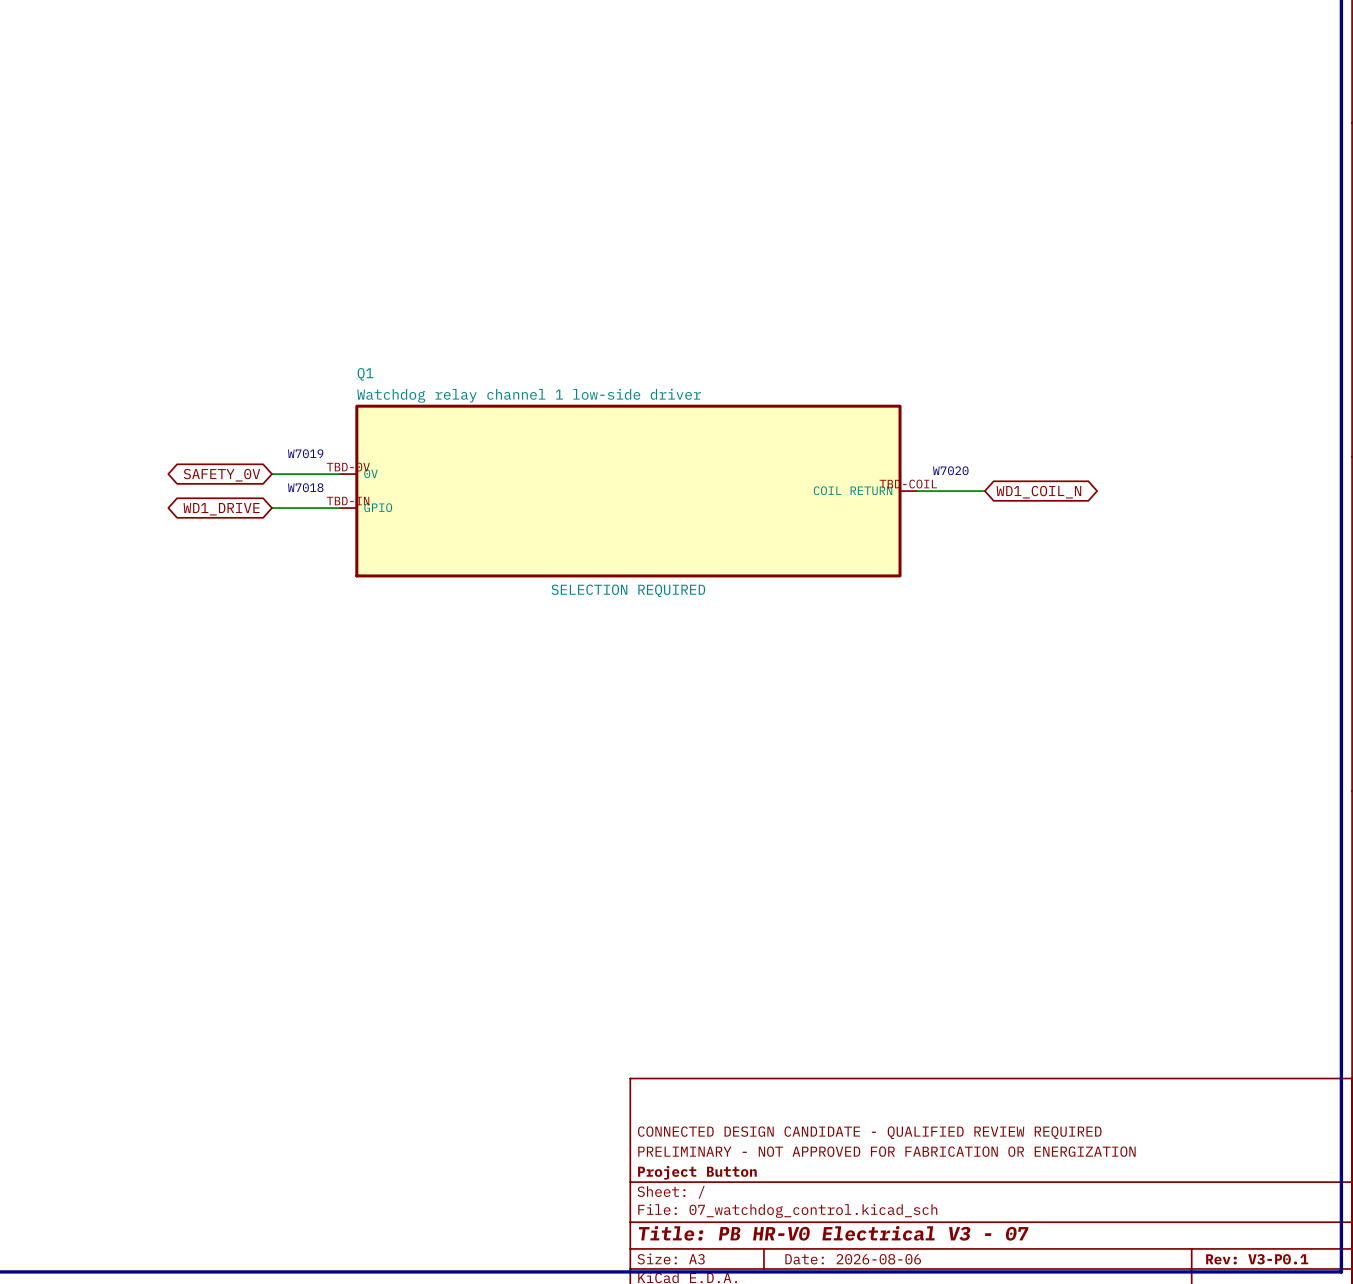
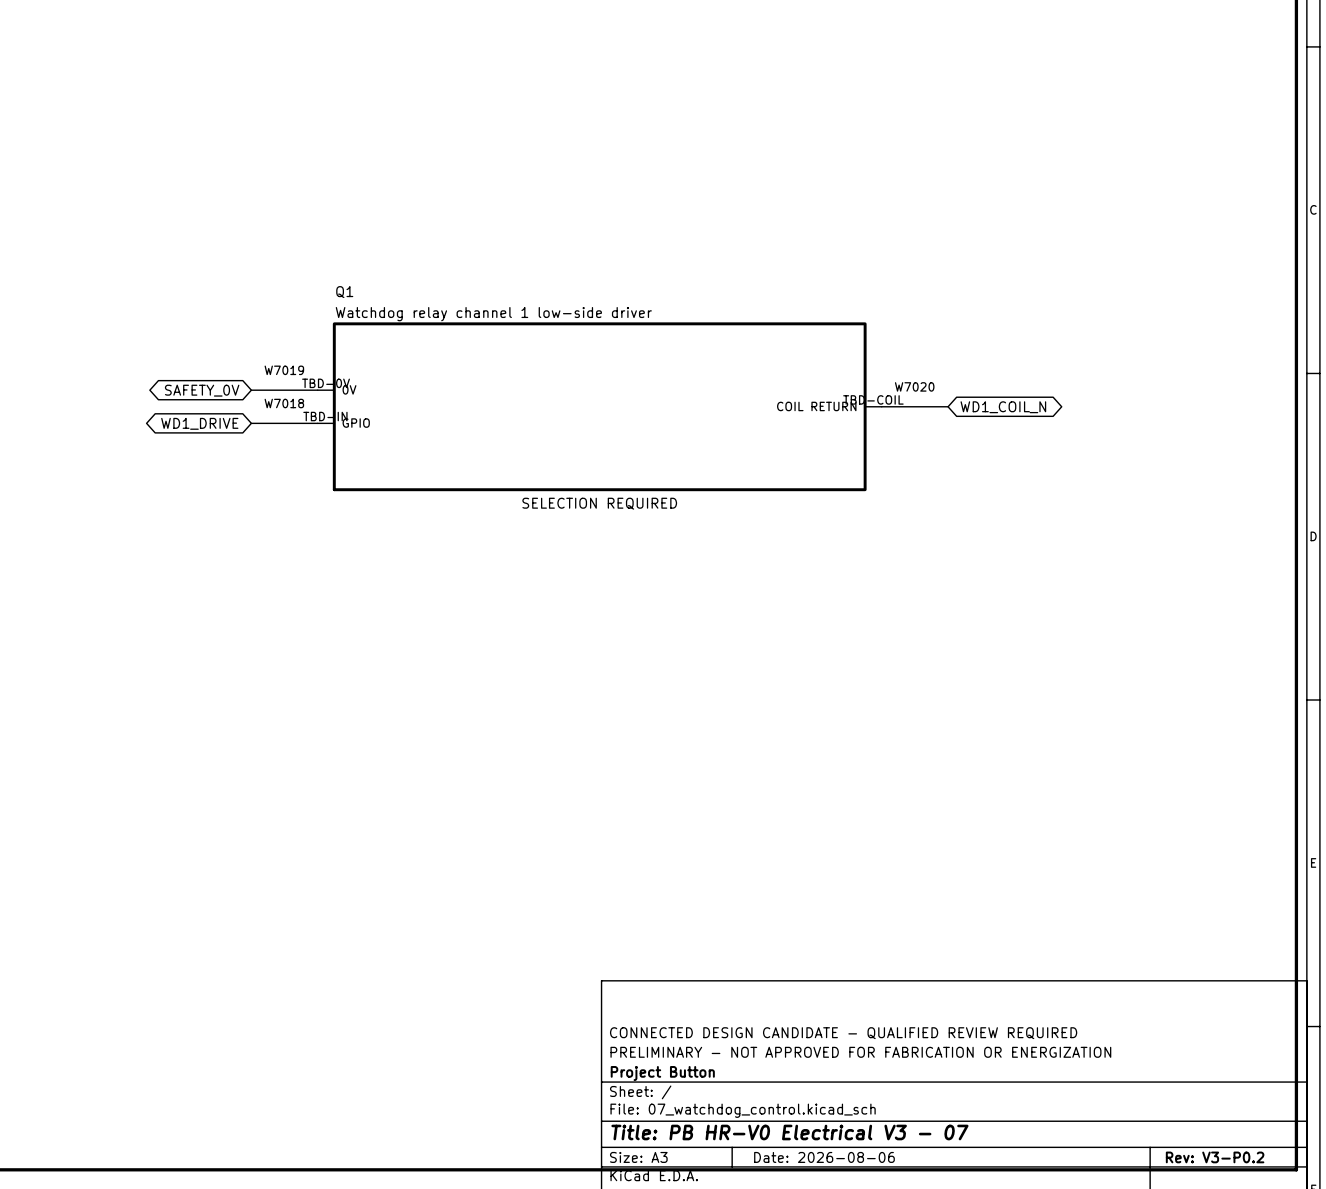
title block: Rev: V3-P0.1 (1257, 1259) -> Rev: V3-P0.2 (1215, 1157)

